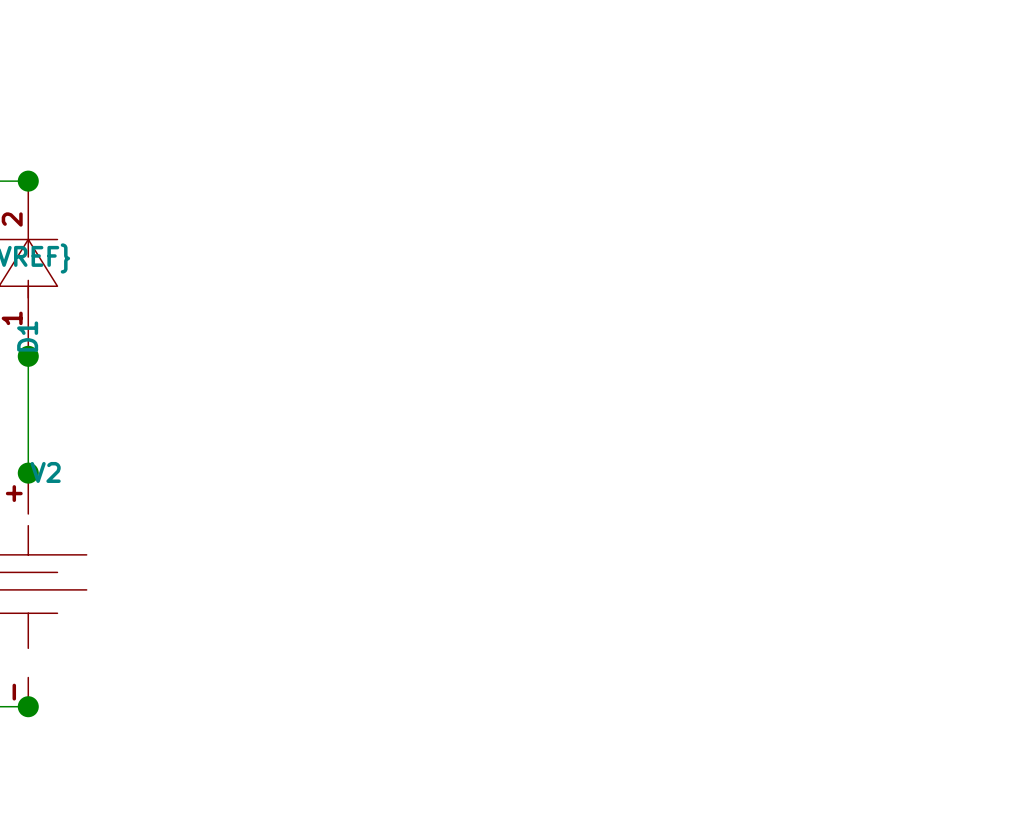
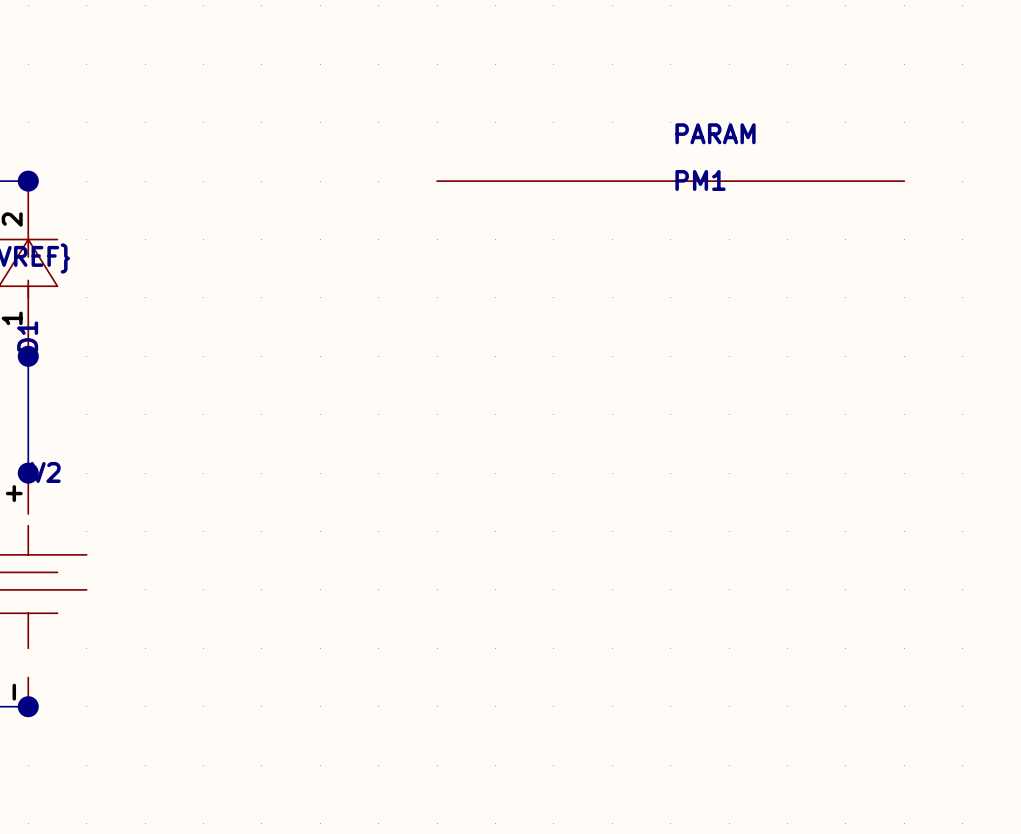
PM1: none -> PARAM (670, 181)

